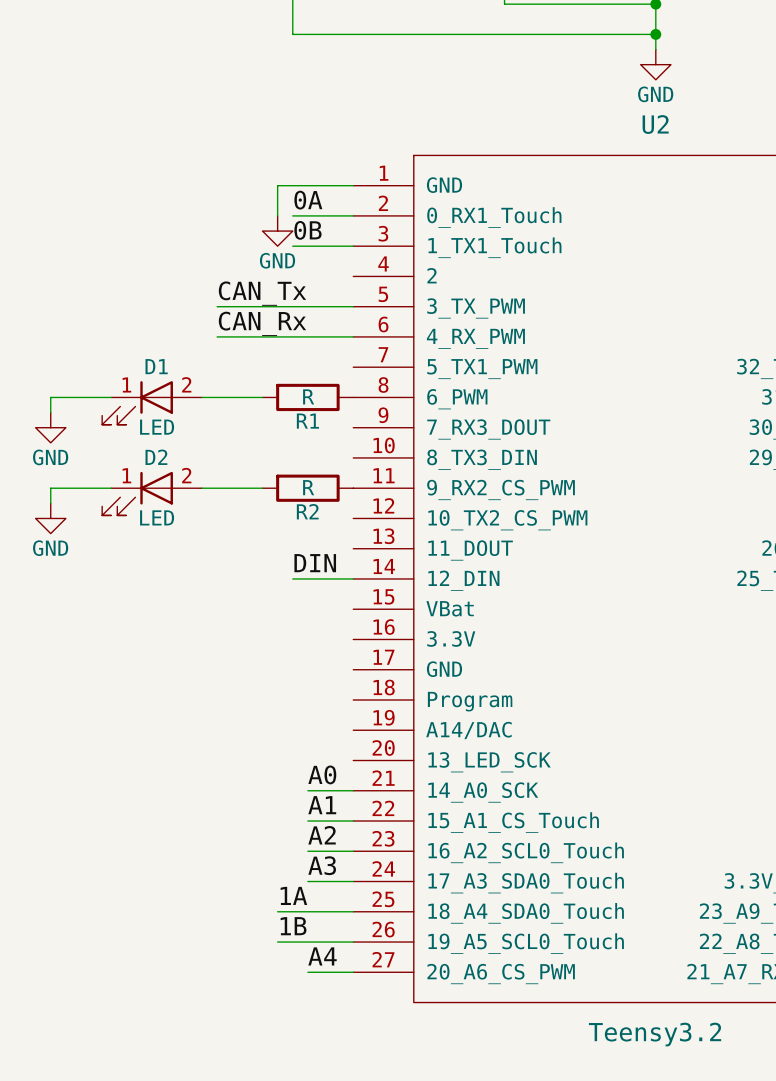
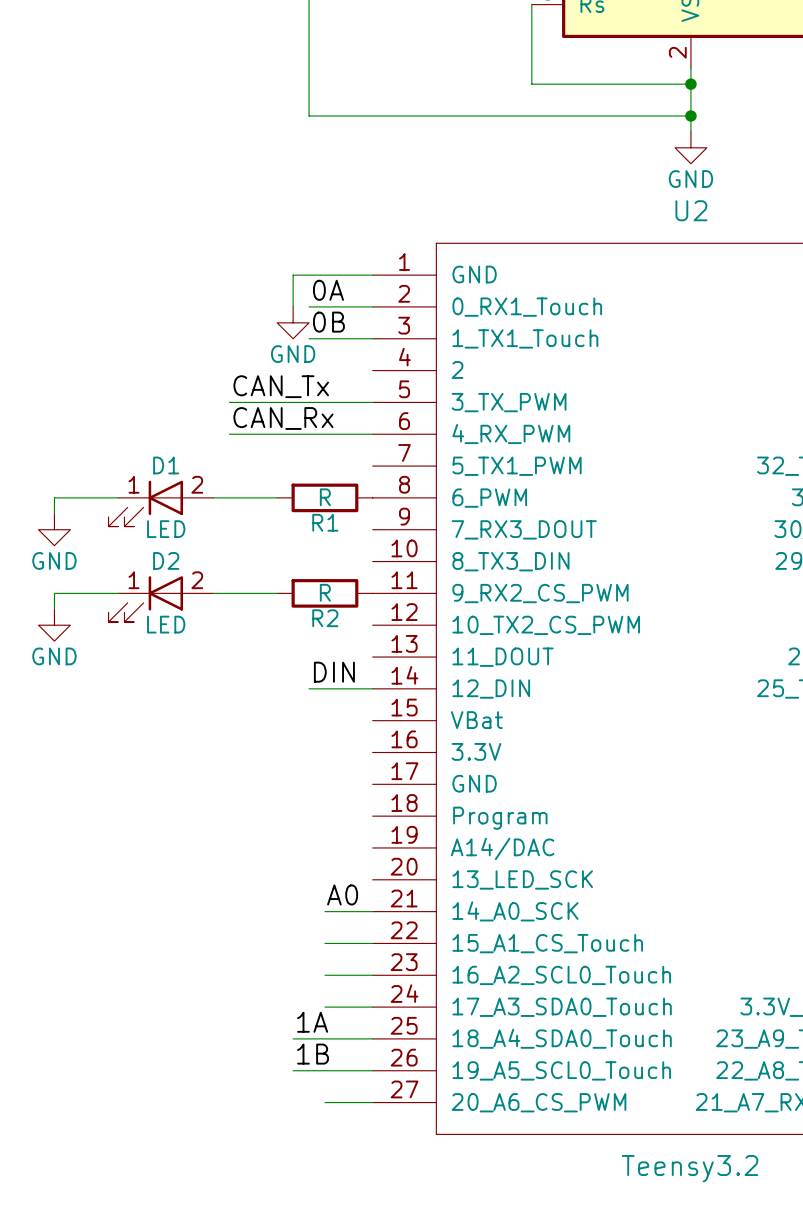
label: A1 (322, 805) -> none
label: A2 (322, 835) -> none
label: A3 (322, 865) -> none
label: A4 (322, 956) -> none

